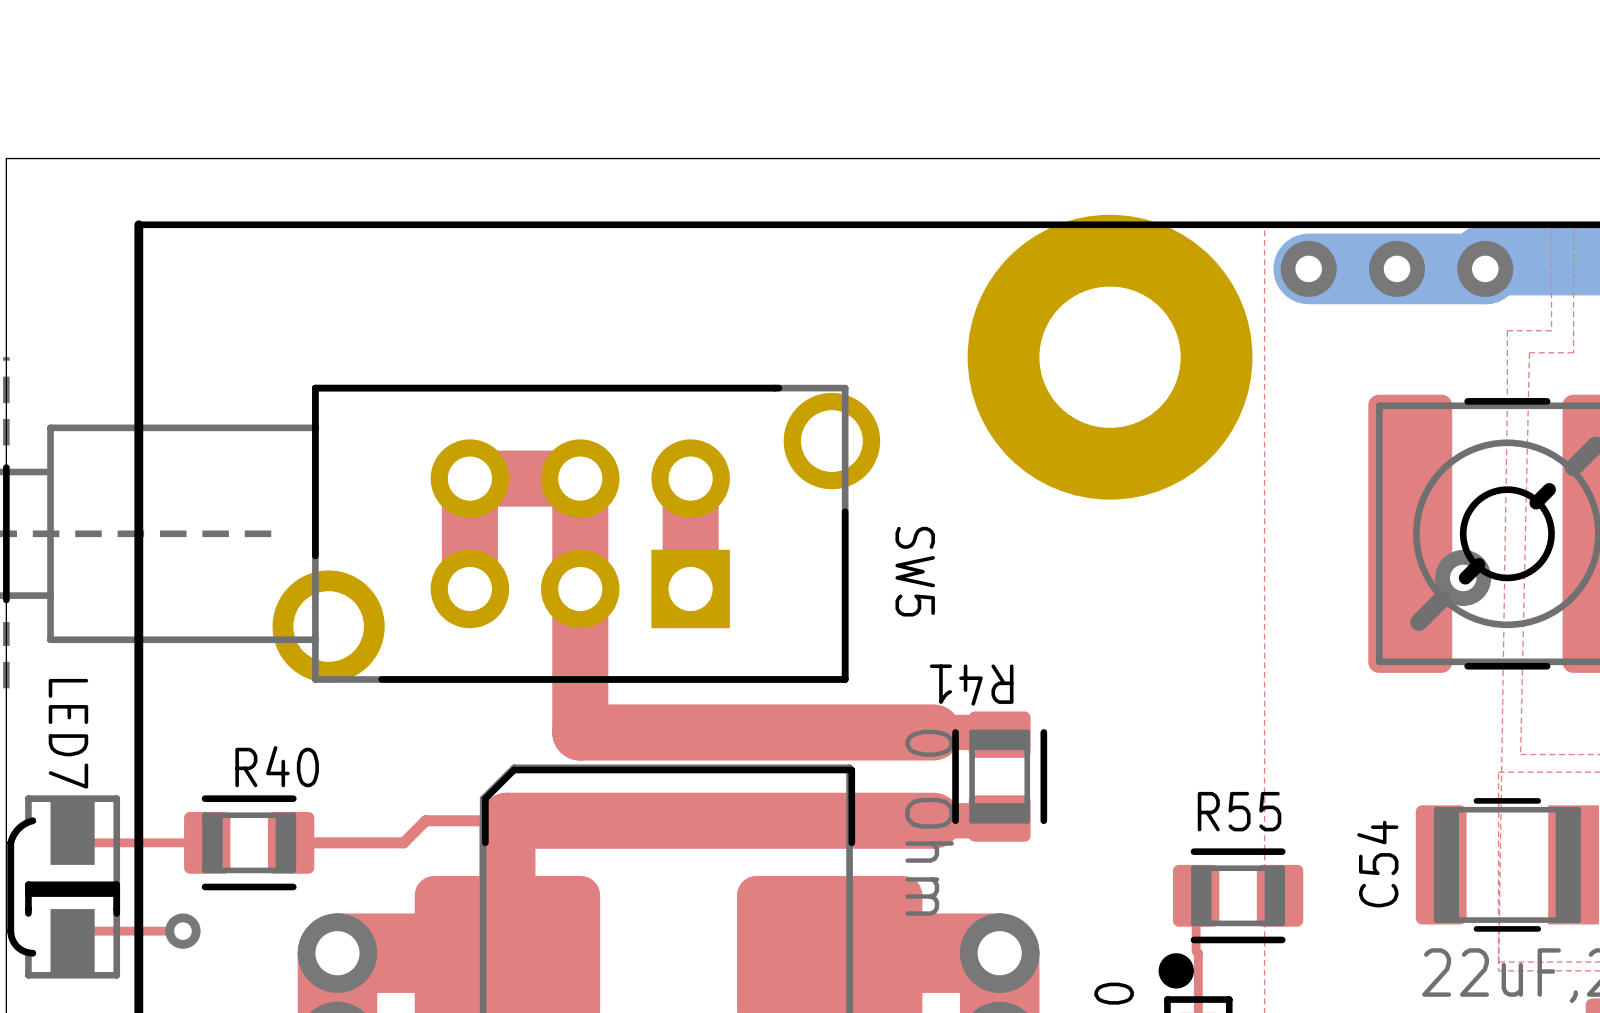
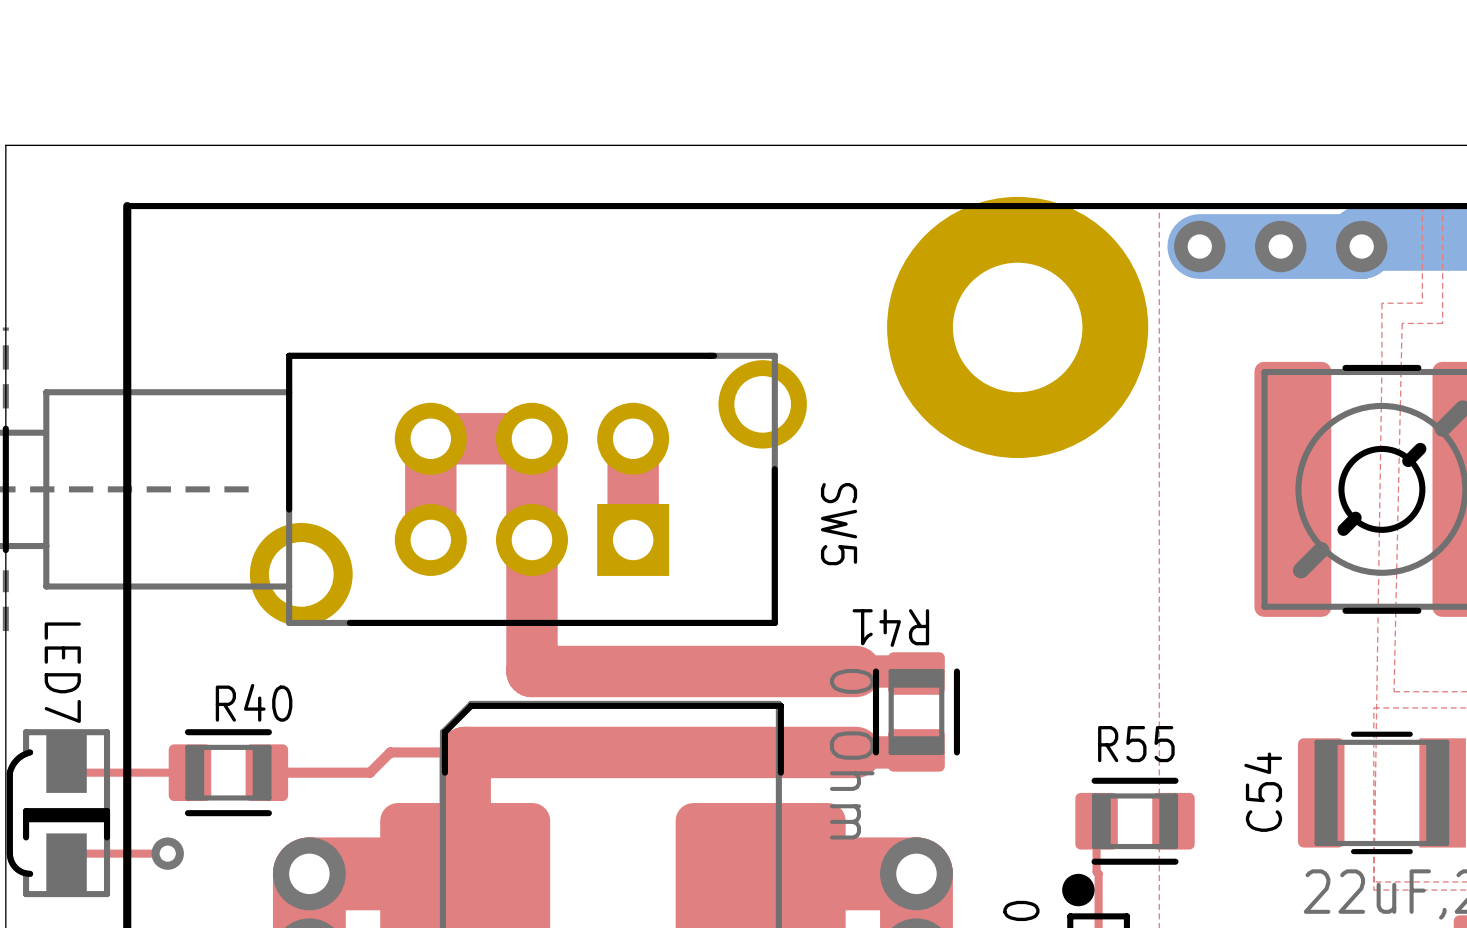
via: (1463, 577) -> none

